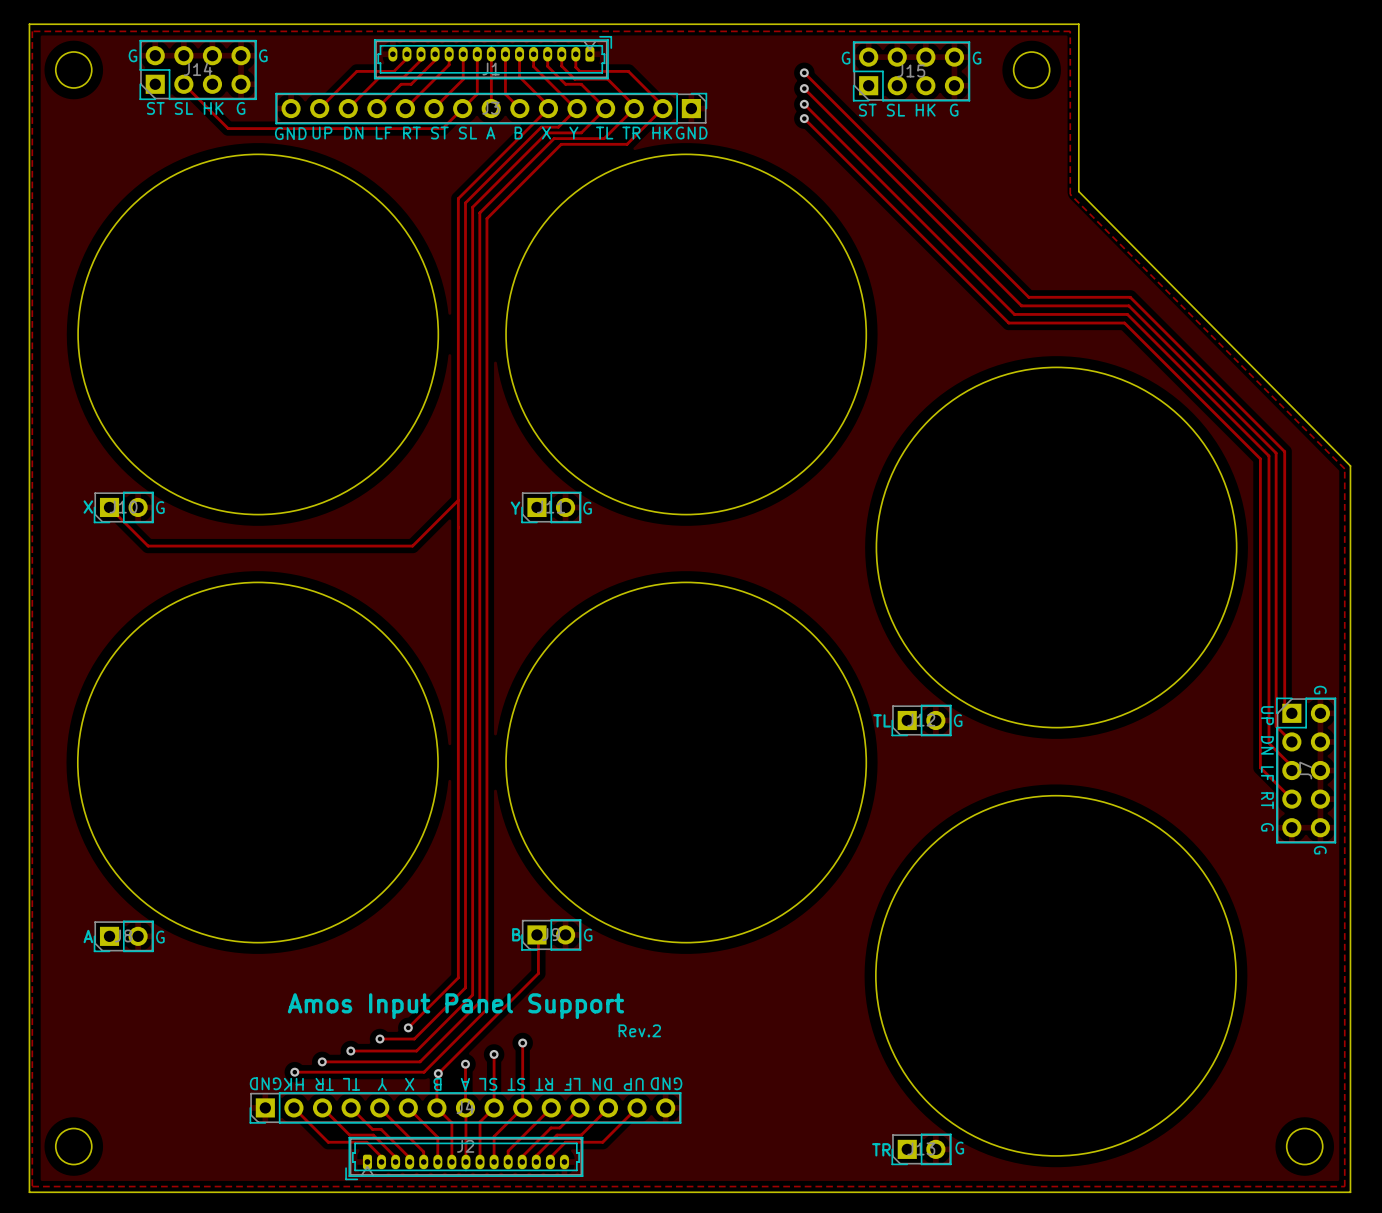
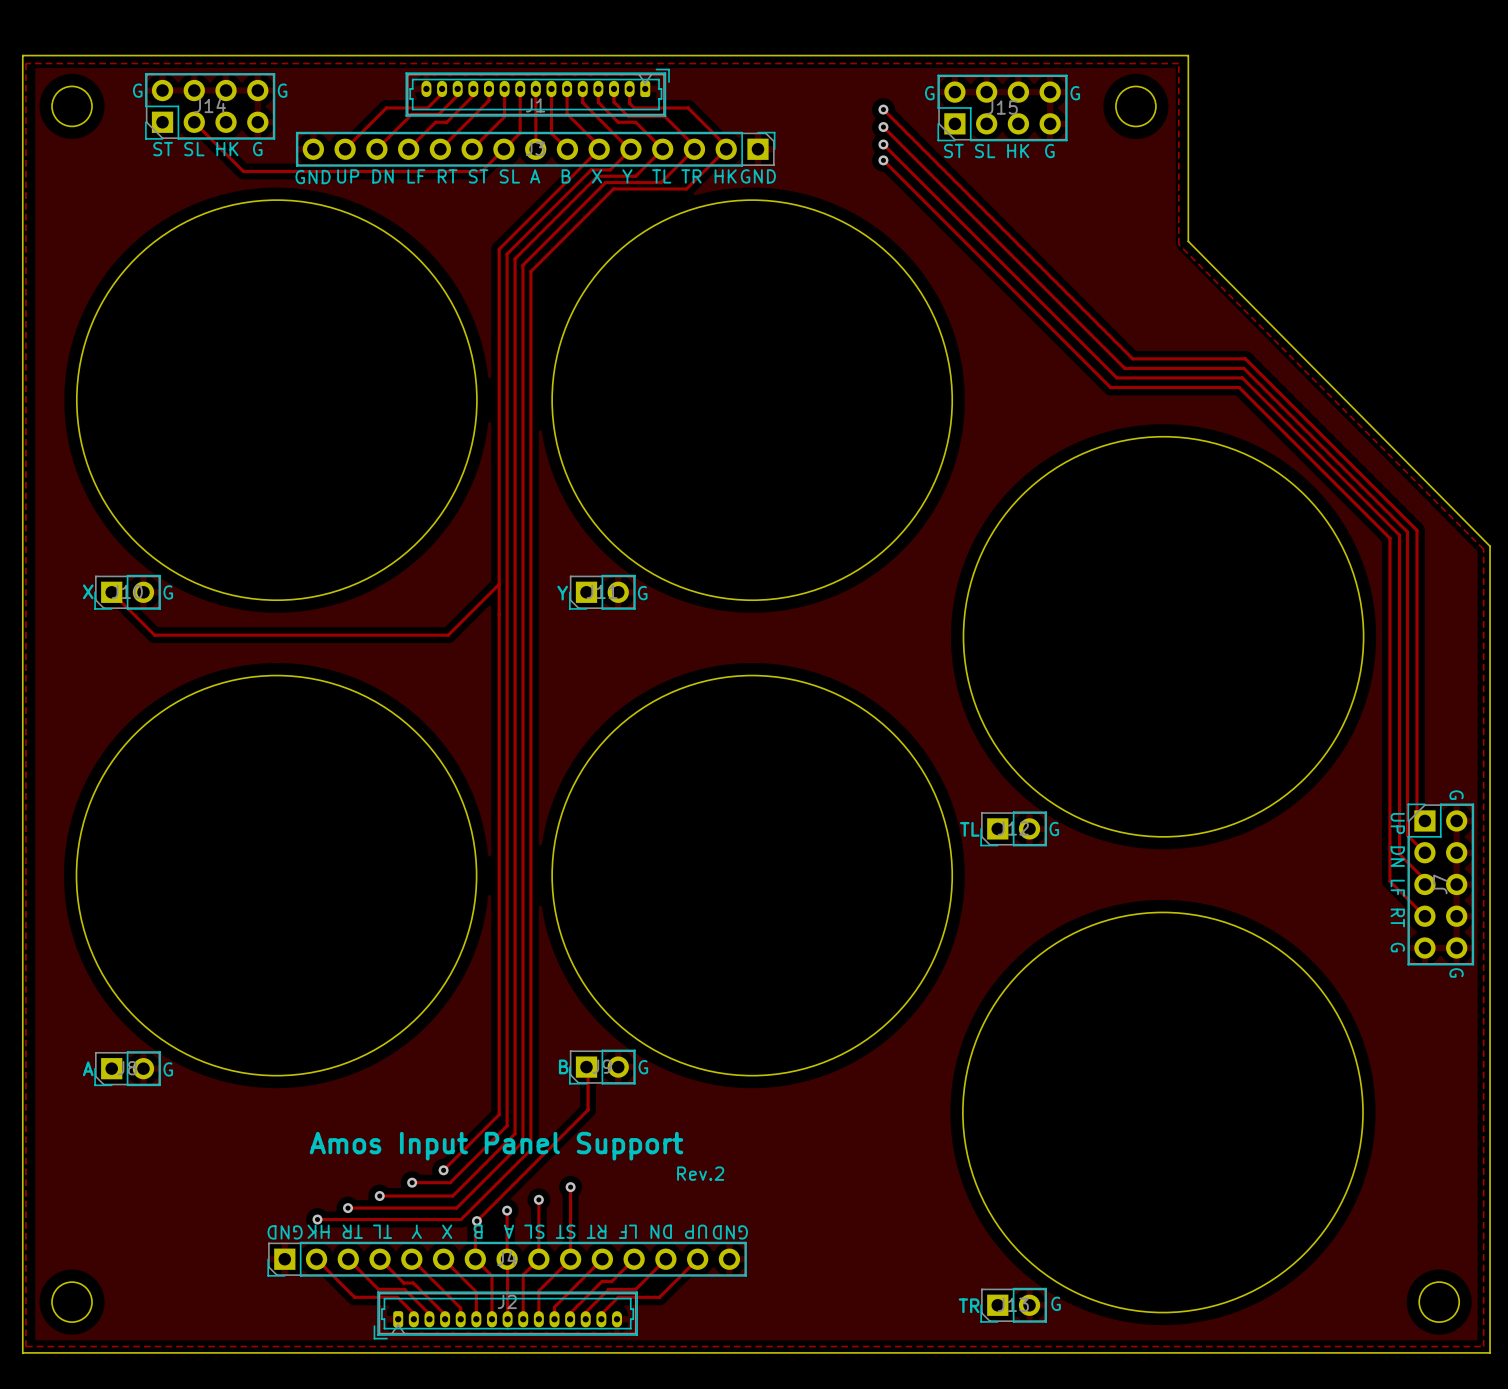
text position: UP DN LF RT ST SL A B X Y TL TR HK (463, 1084) -> UP DN LF RT ST SL A B X Y TL TR HK (507, 1231)

